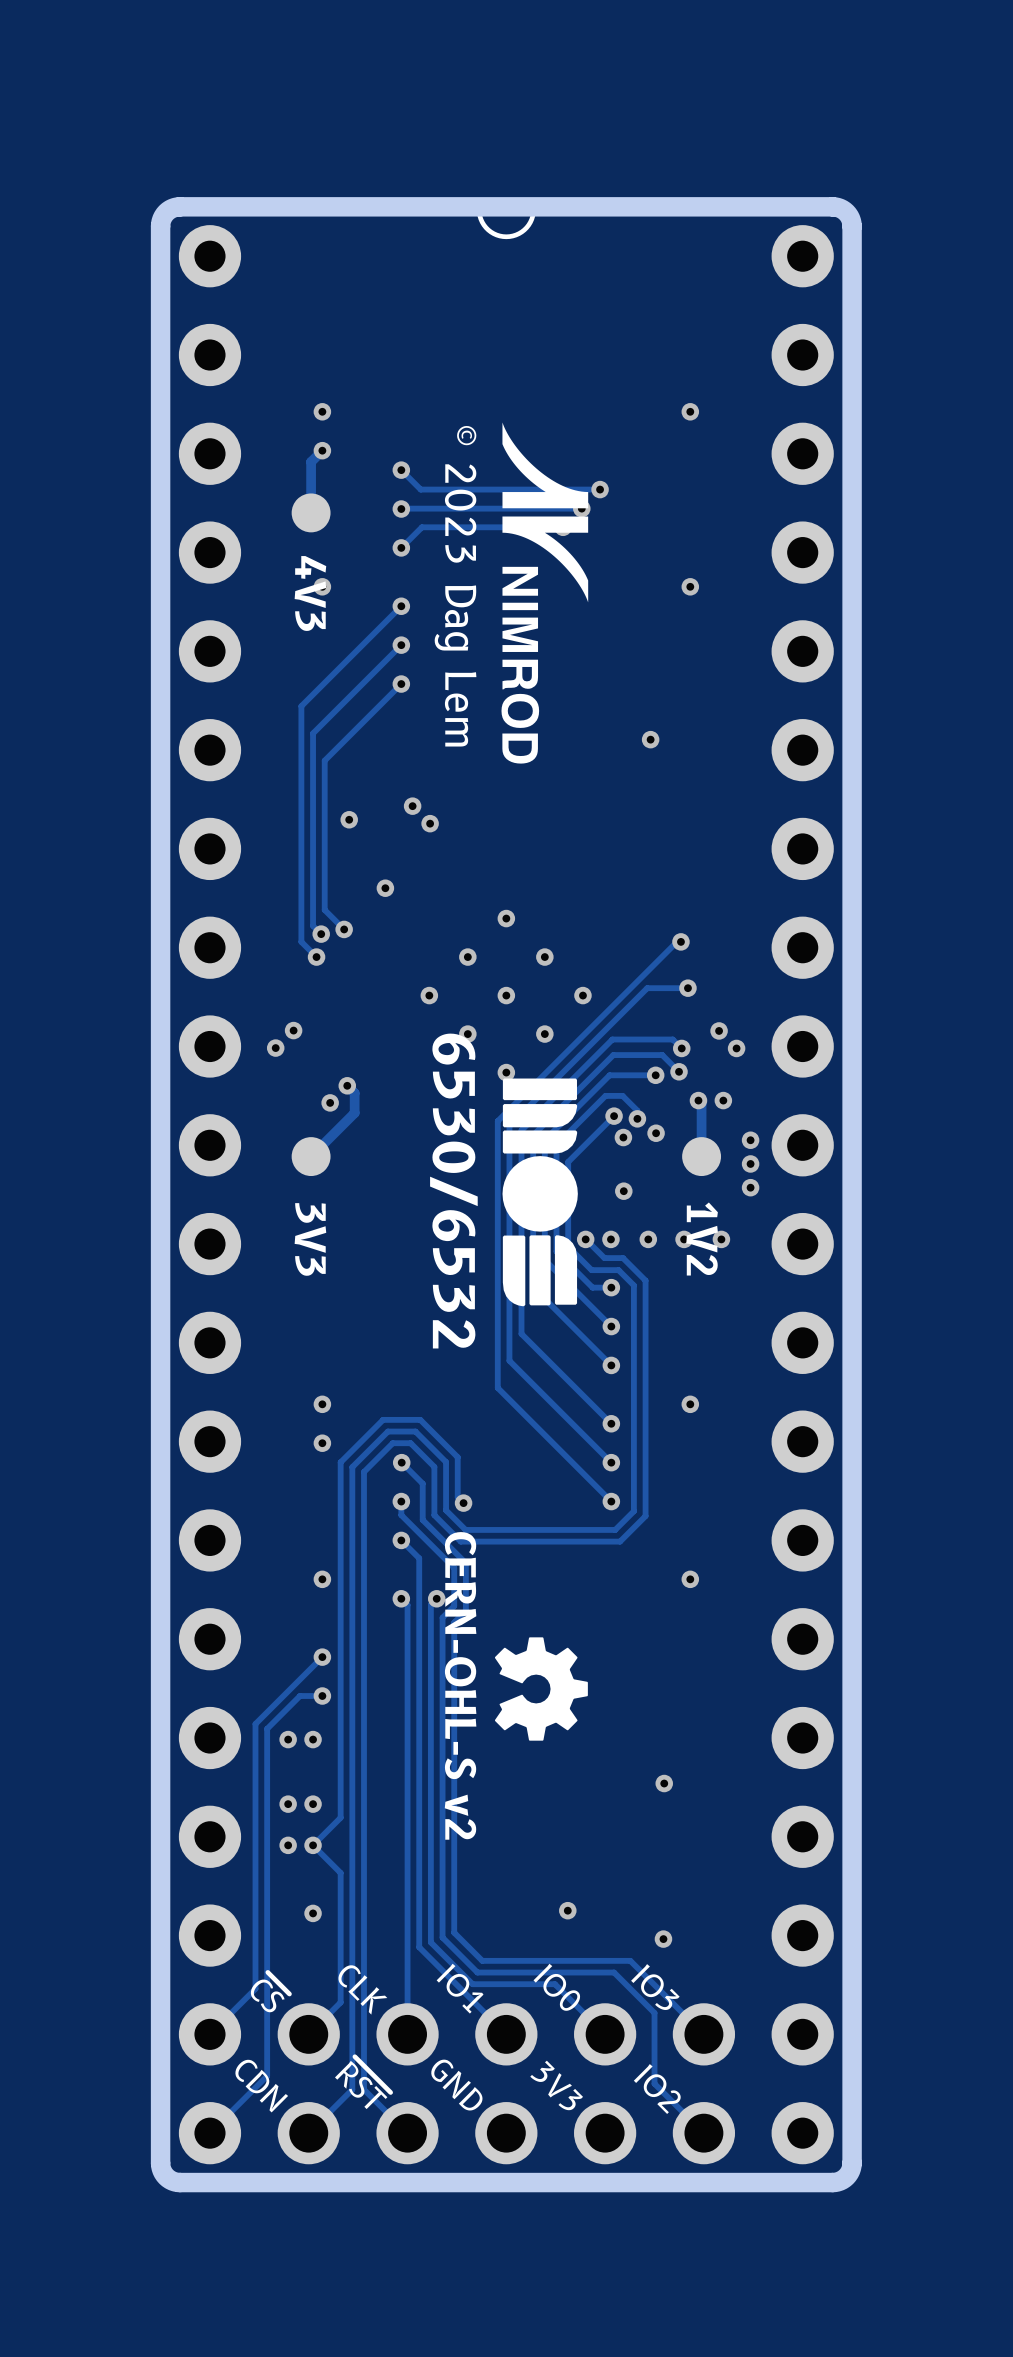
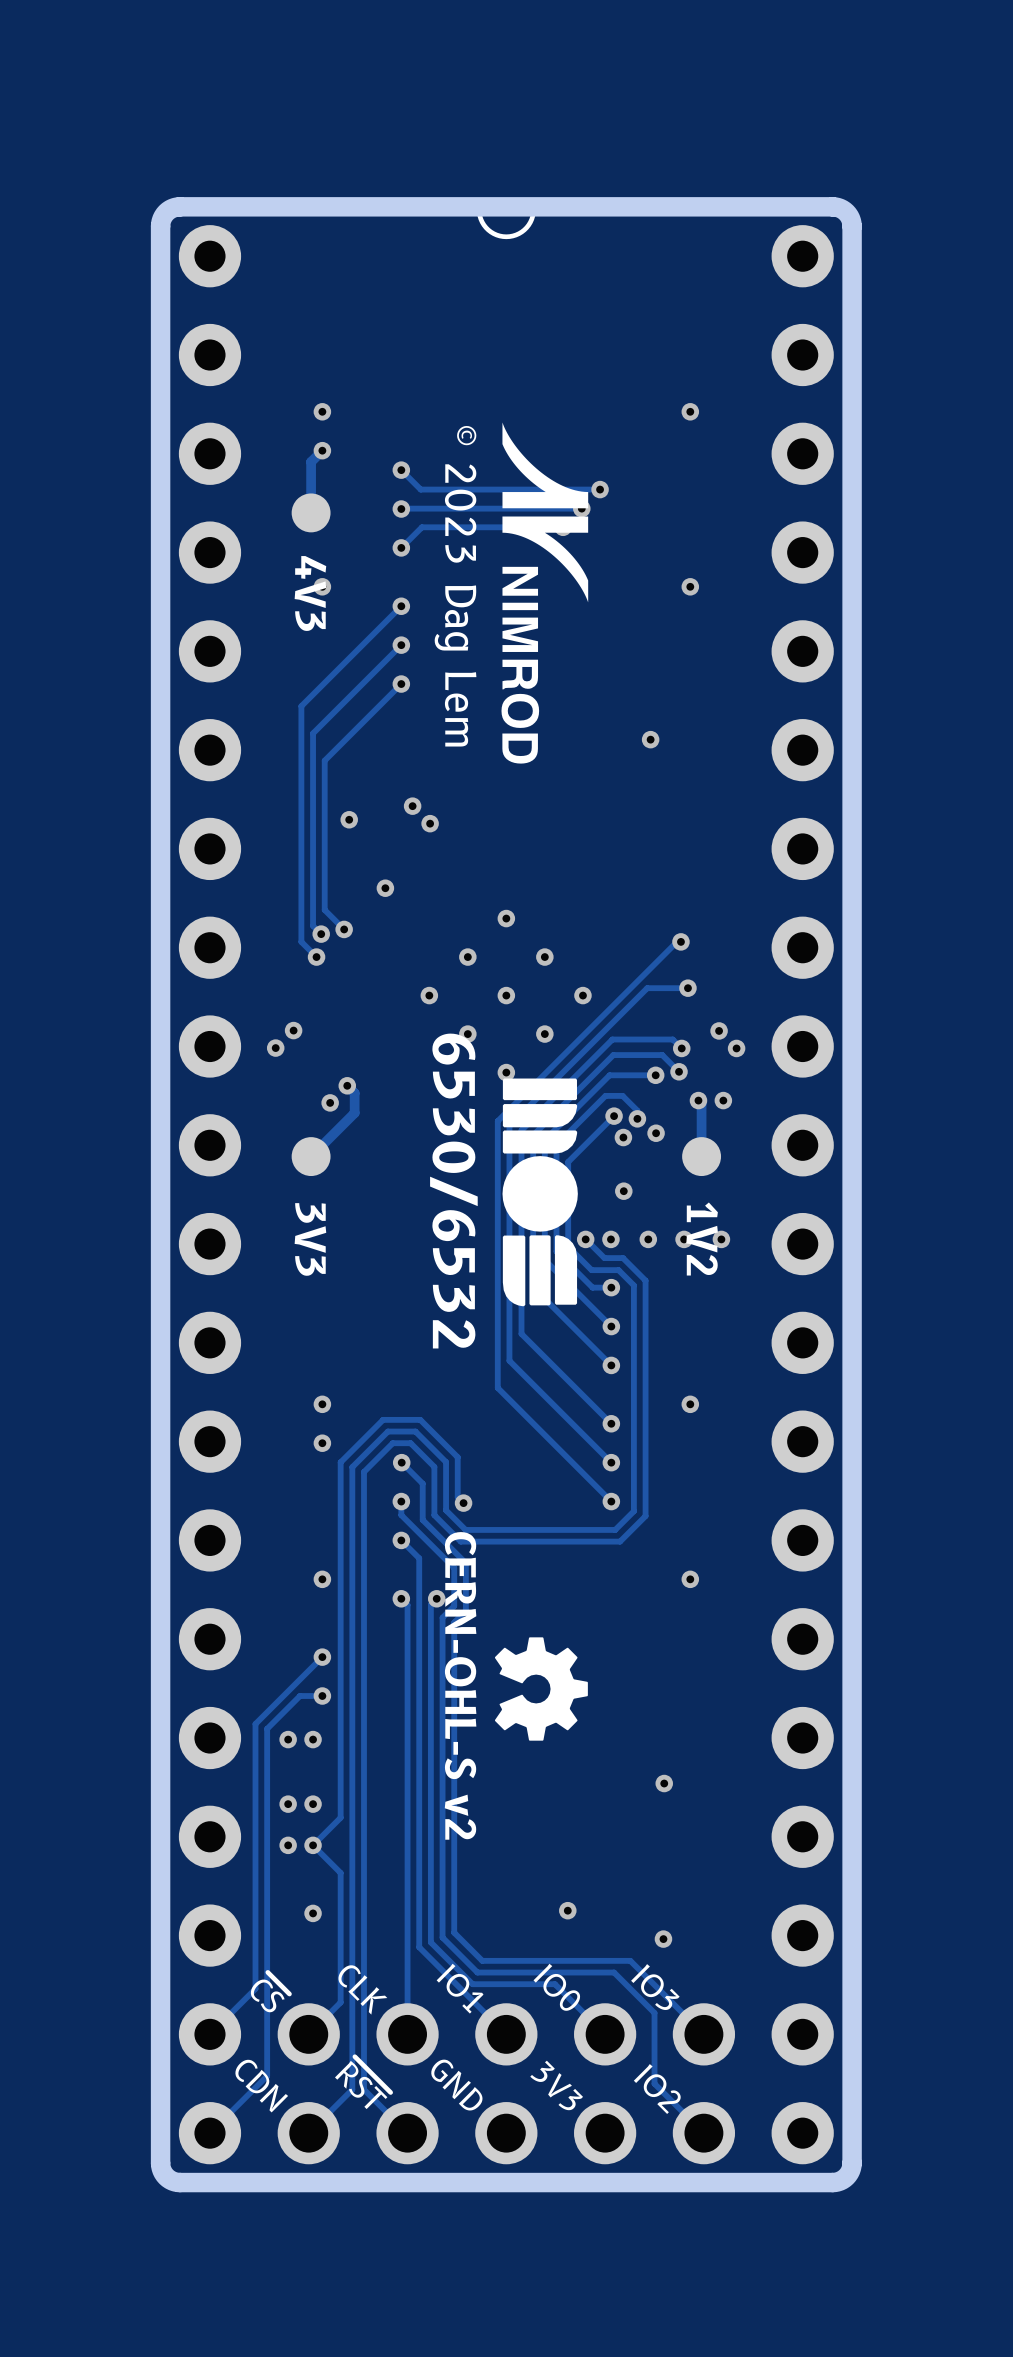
via: (750, 1140) -> none
via: (750, 1163) -> none
via: (750, 1187) -> none

